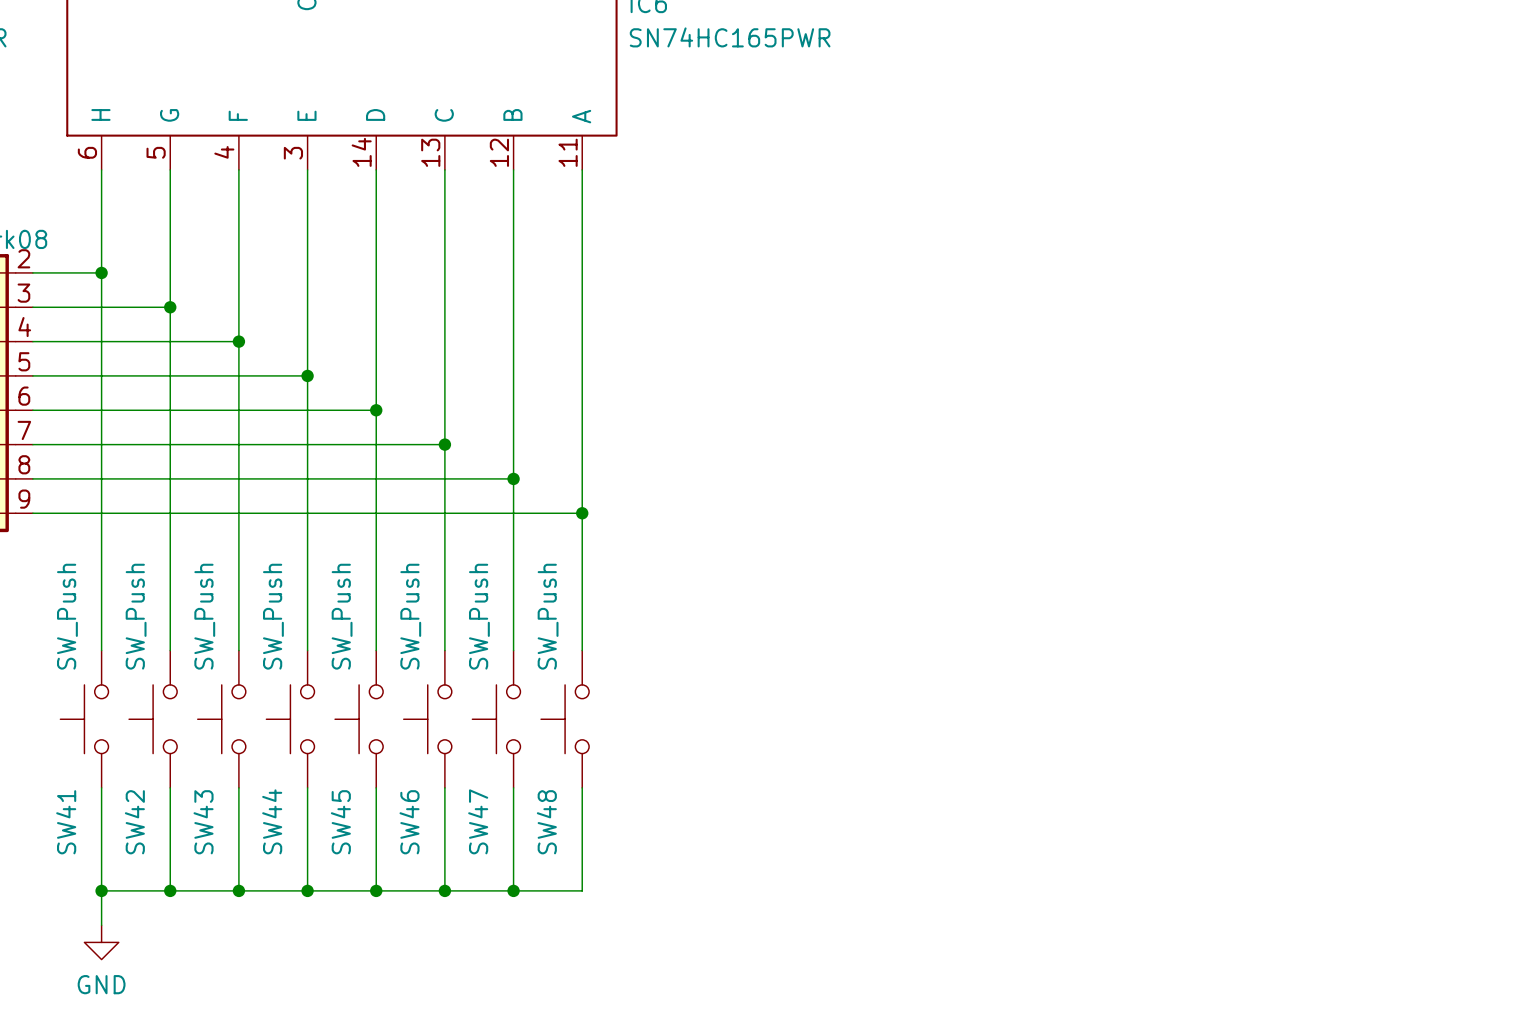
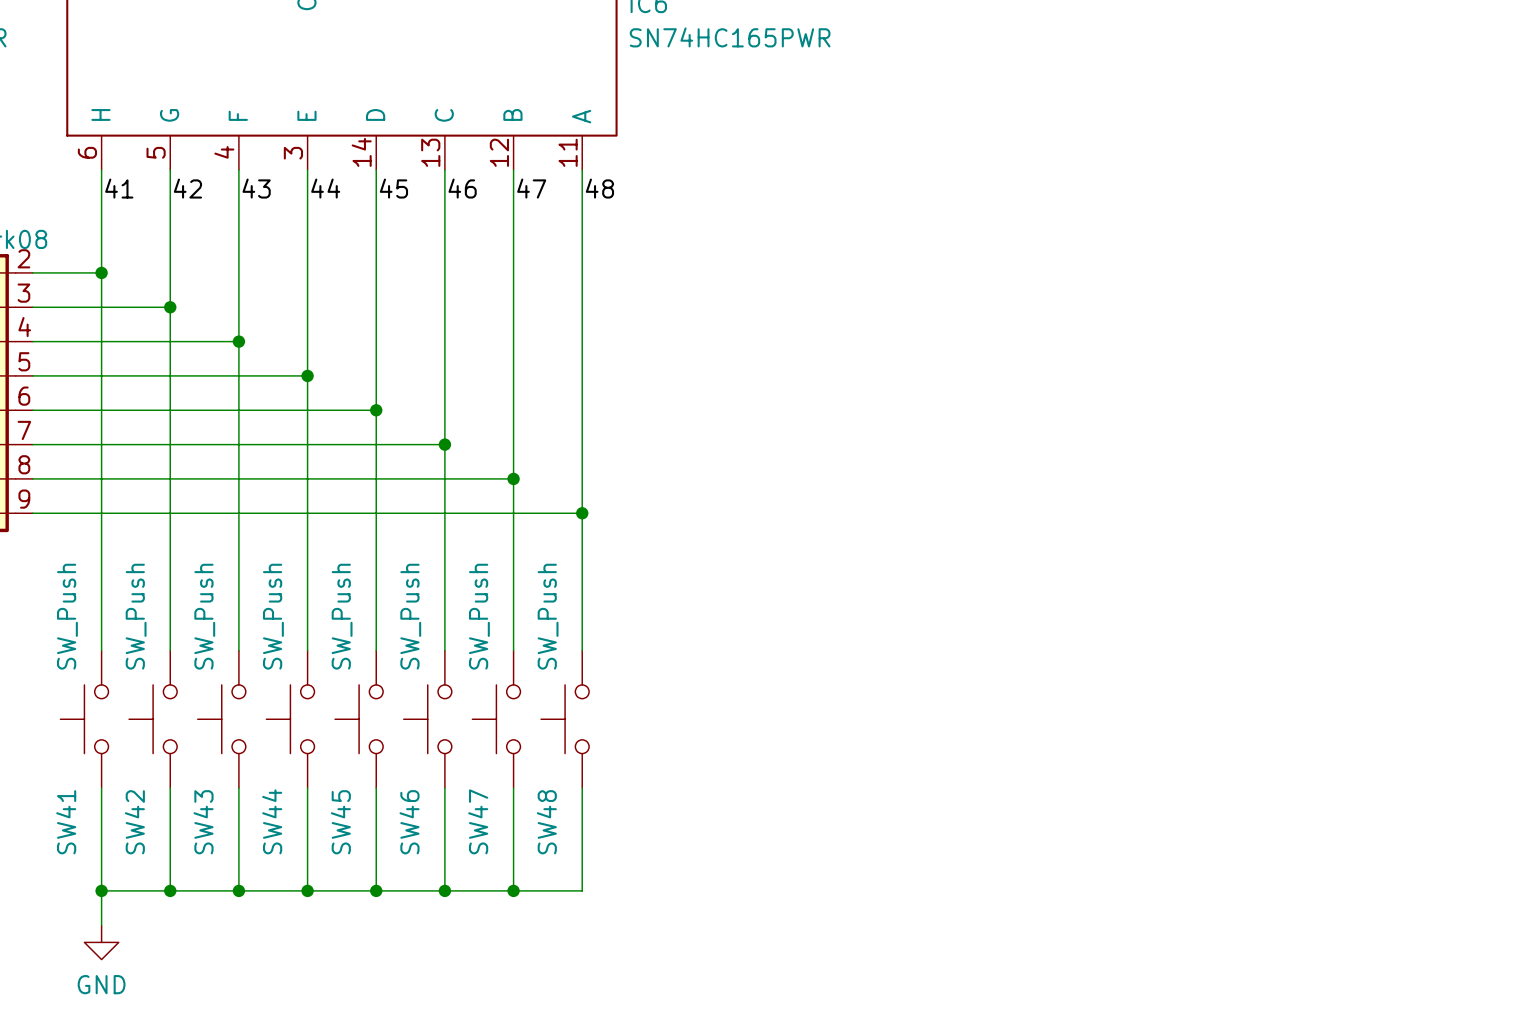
label: none -> 41 (119, 188)
label: none -> 42 (187, 188)
label: none -> 43 (256, 188)
label: none -> 44 (325, 188)
label: none -> 45 (393, 188)
label: none -> 46 (462, 188)
label: none -> 47 (531, 188)
label: none -> 48 (599, 188)

